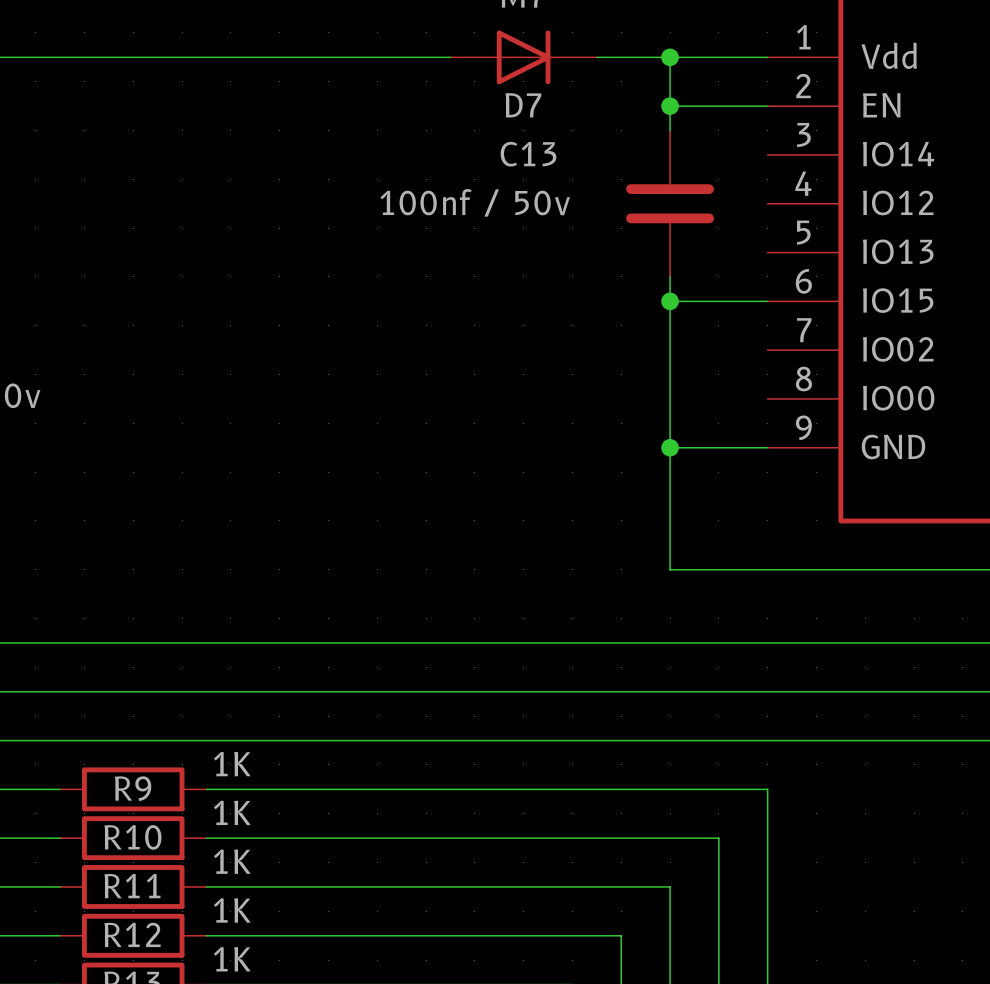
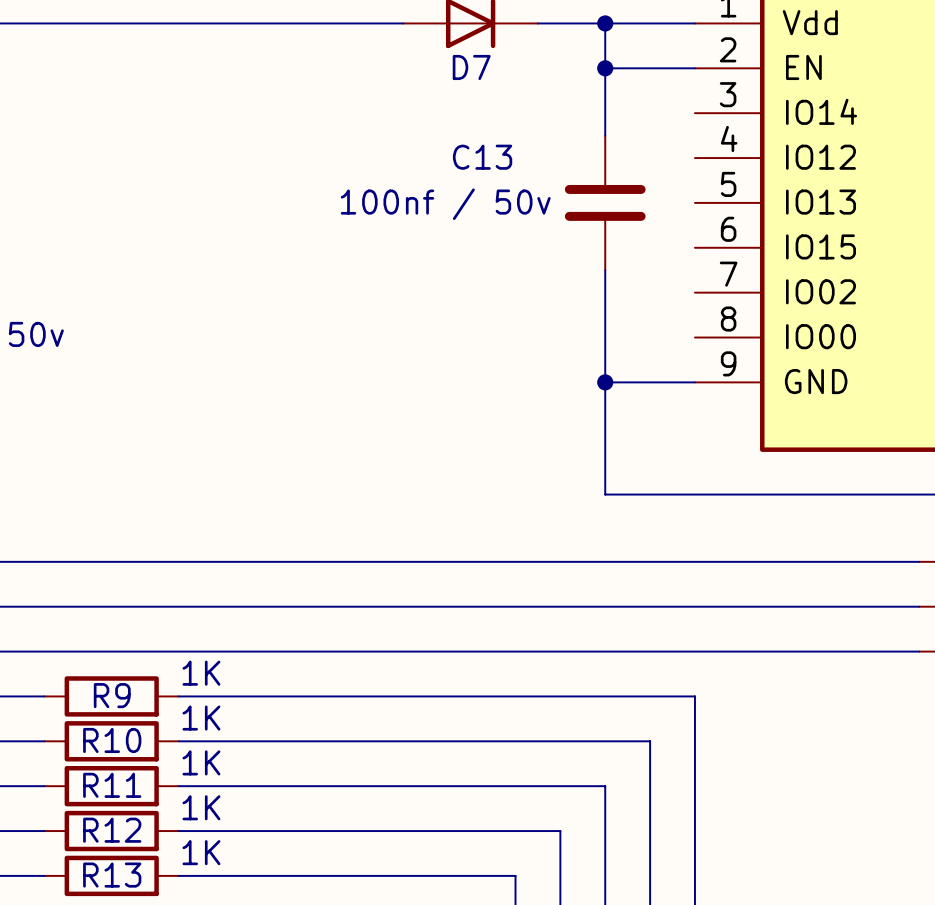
C13 position: (670, 203) -> (605, 202)
wire: (670, 301) (767, 301) -> none
junction: (670, 301) -> none

